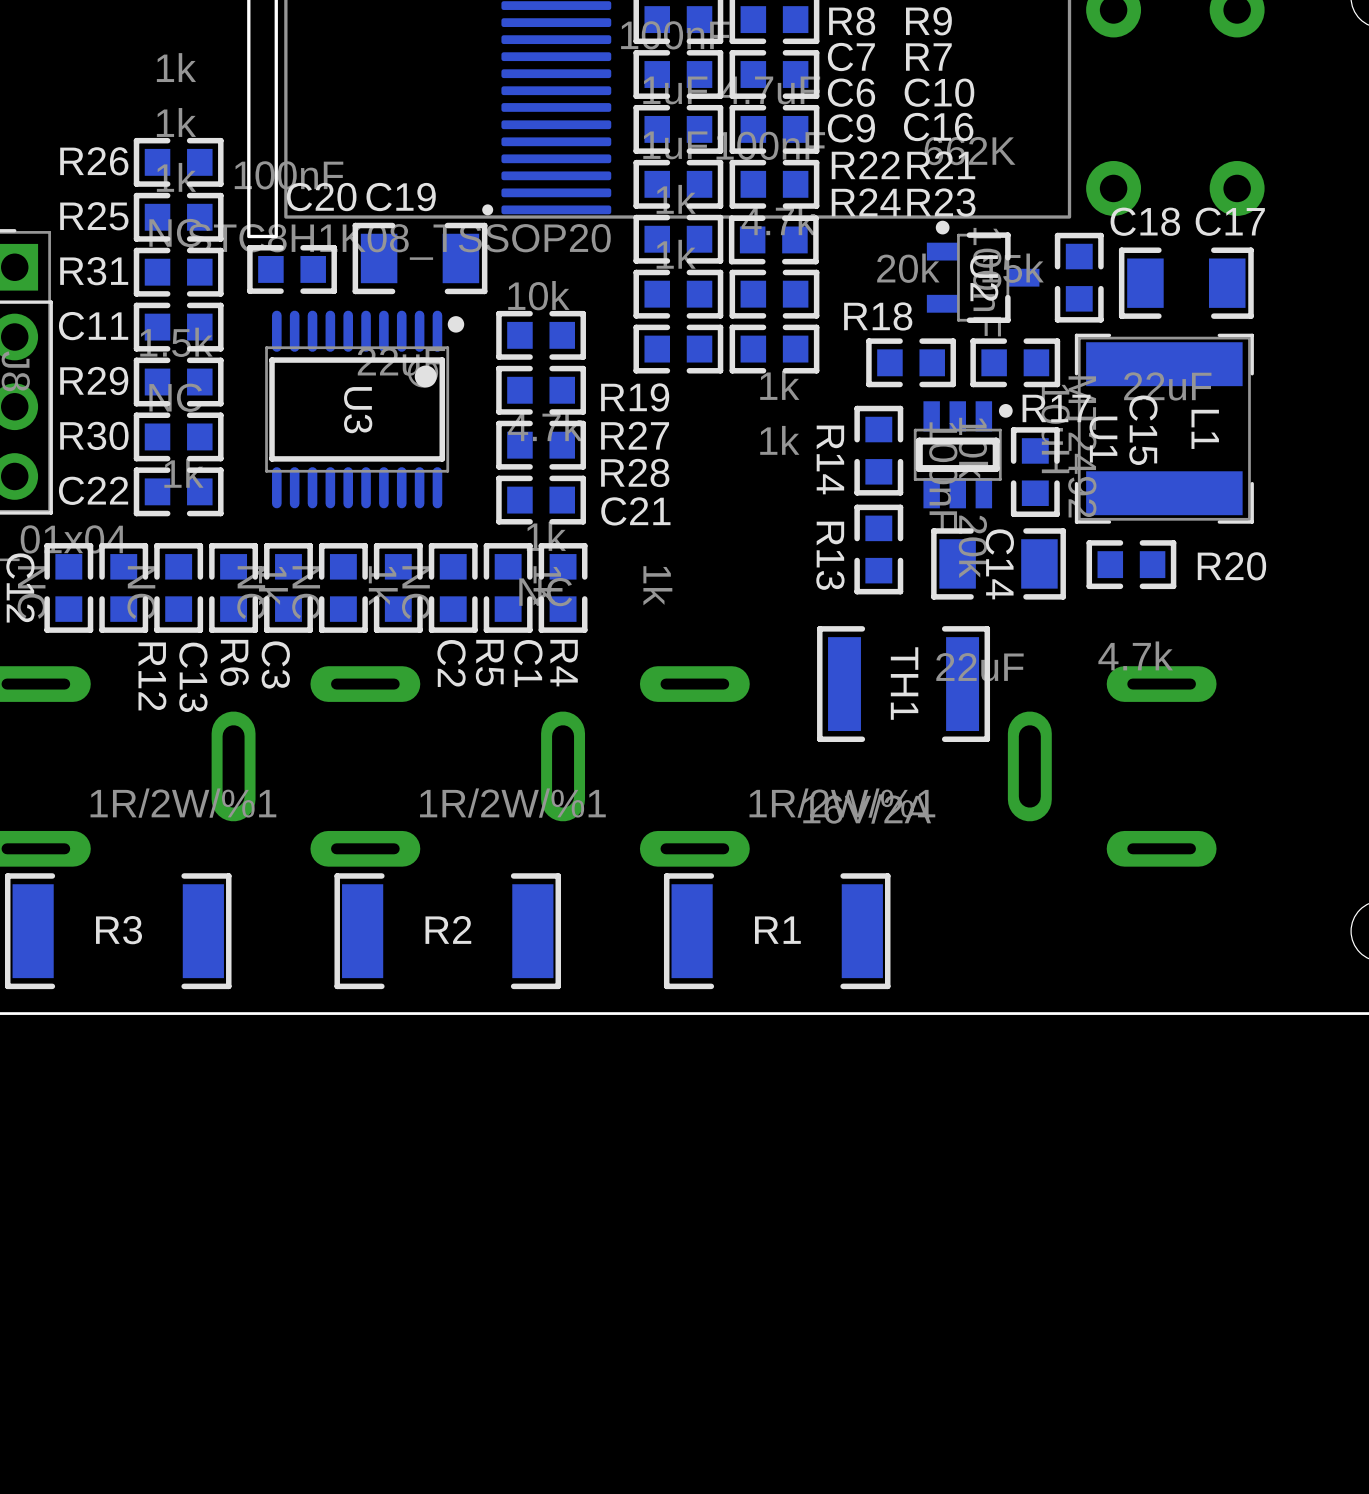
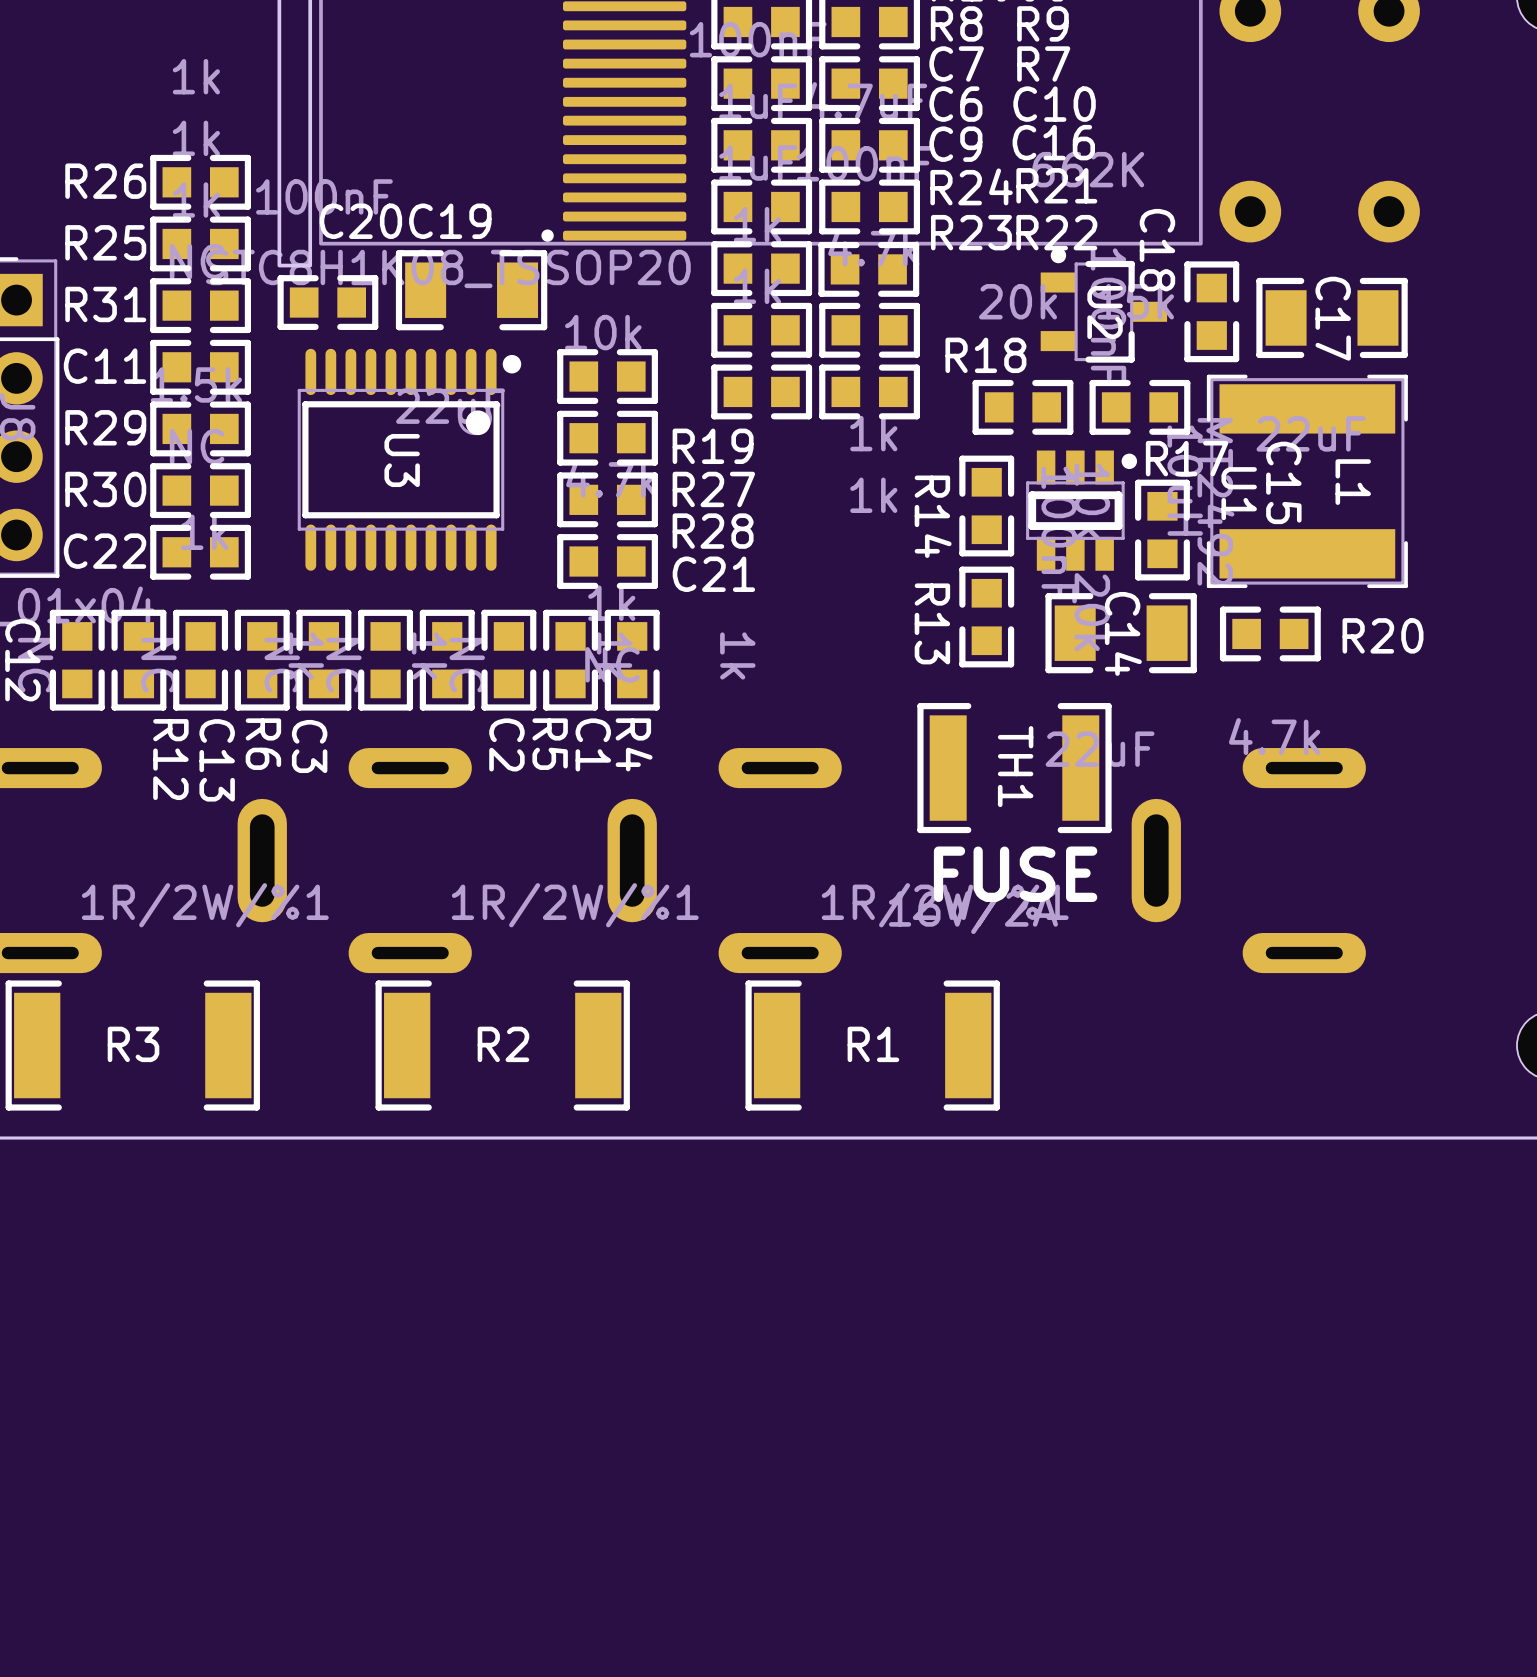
R22 name: R22 (865, 165) -> R24 (971, 186)
R24 name: R24 (866, 202) -> R23 (971, 232)
R23 name: R23 (941, 202) -> R22 (1056, 232)
C18 name rotation: 0° (1145, 221) -> 90° clockwise (1157, 250)
C18 name position: C18 (1145, 221) -> C18 (1157, 250)
C17 name rotation: 0° (1230, 221) -> 90° clockwise (1333, 318)
text: none -> FUSE (1015, 874)

